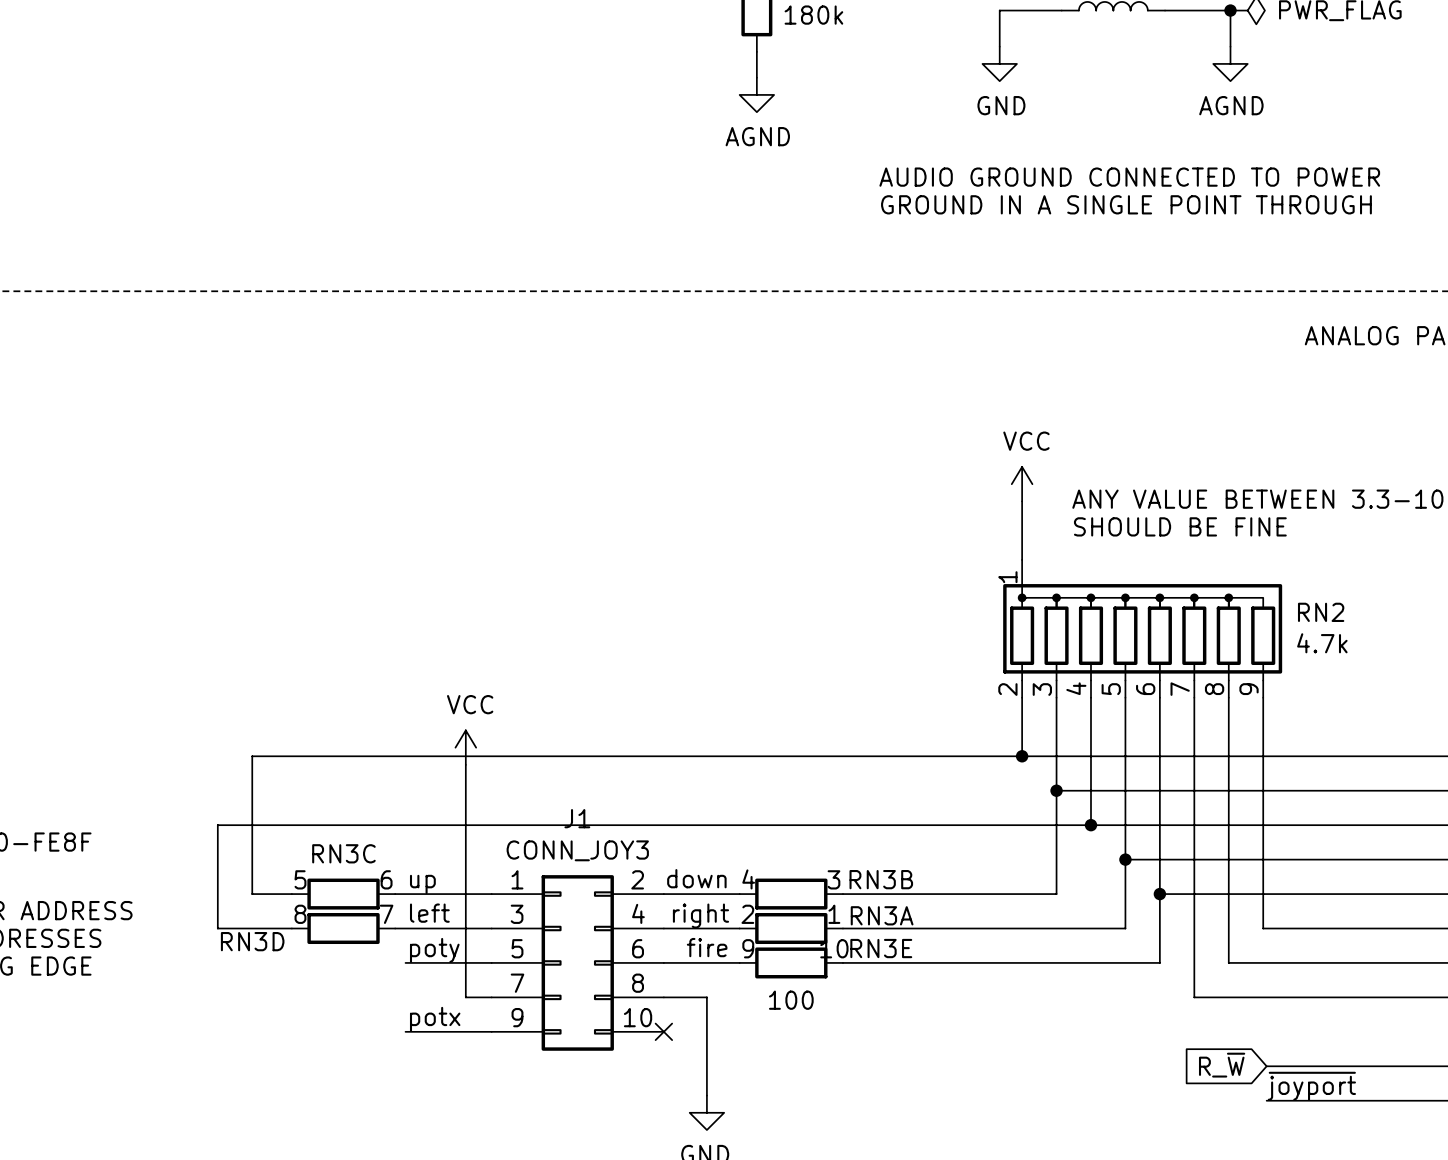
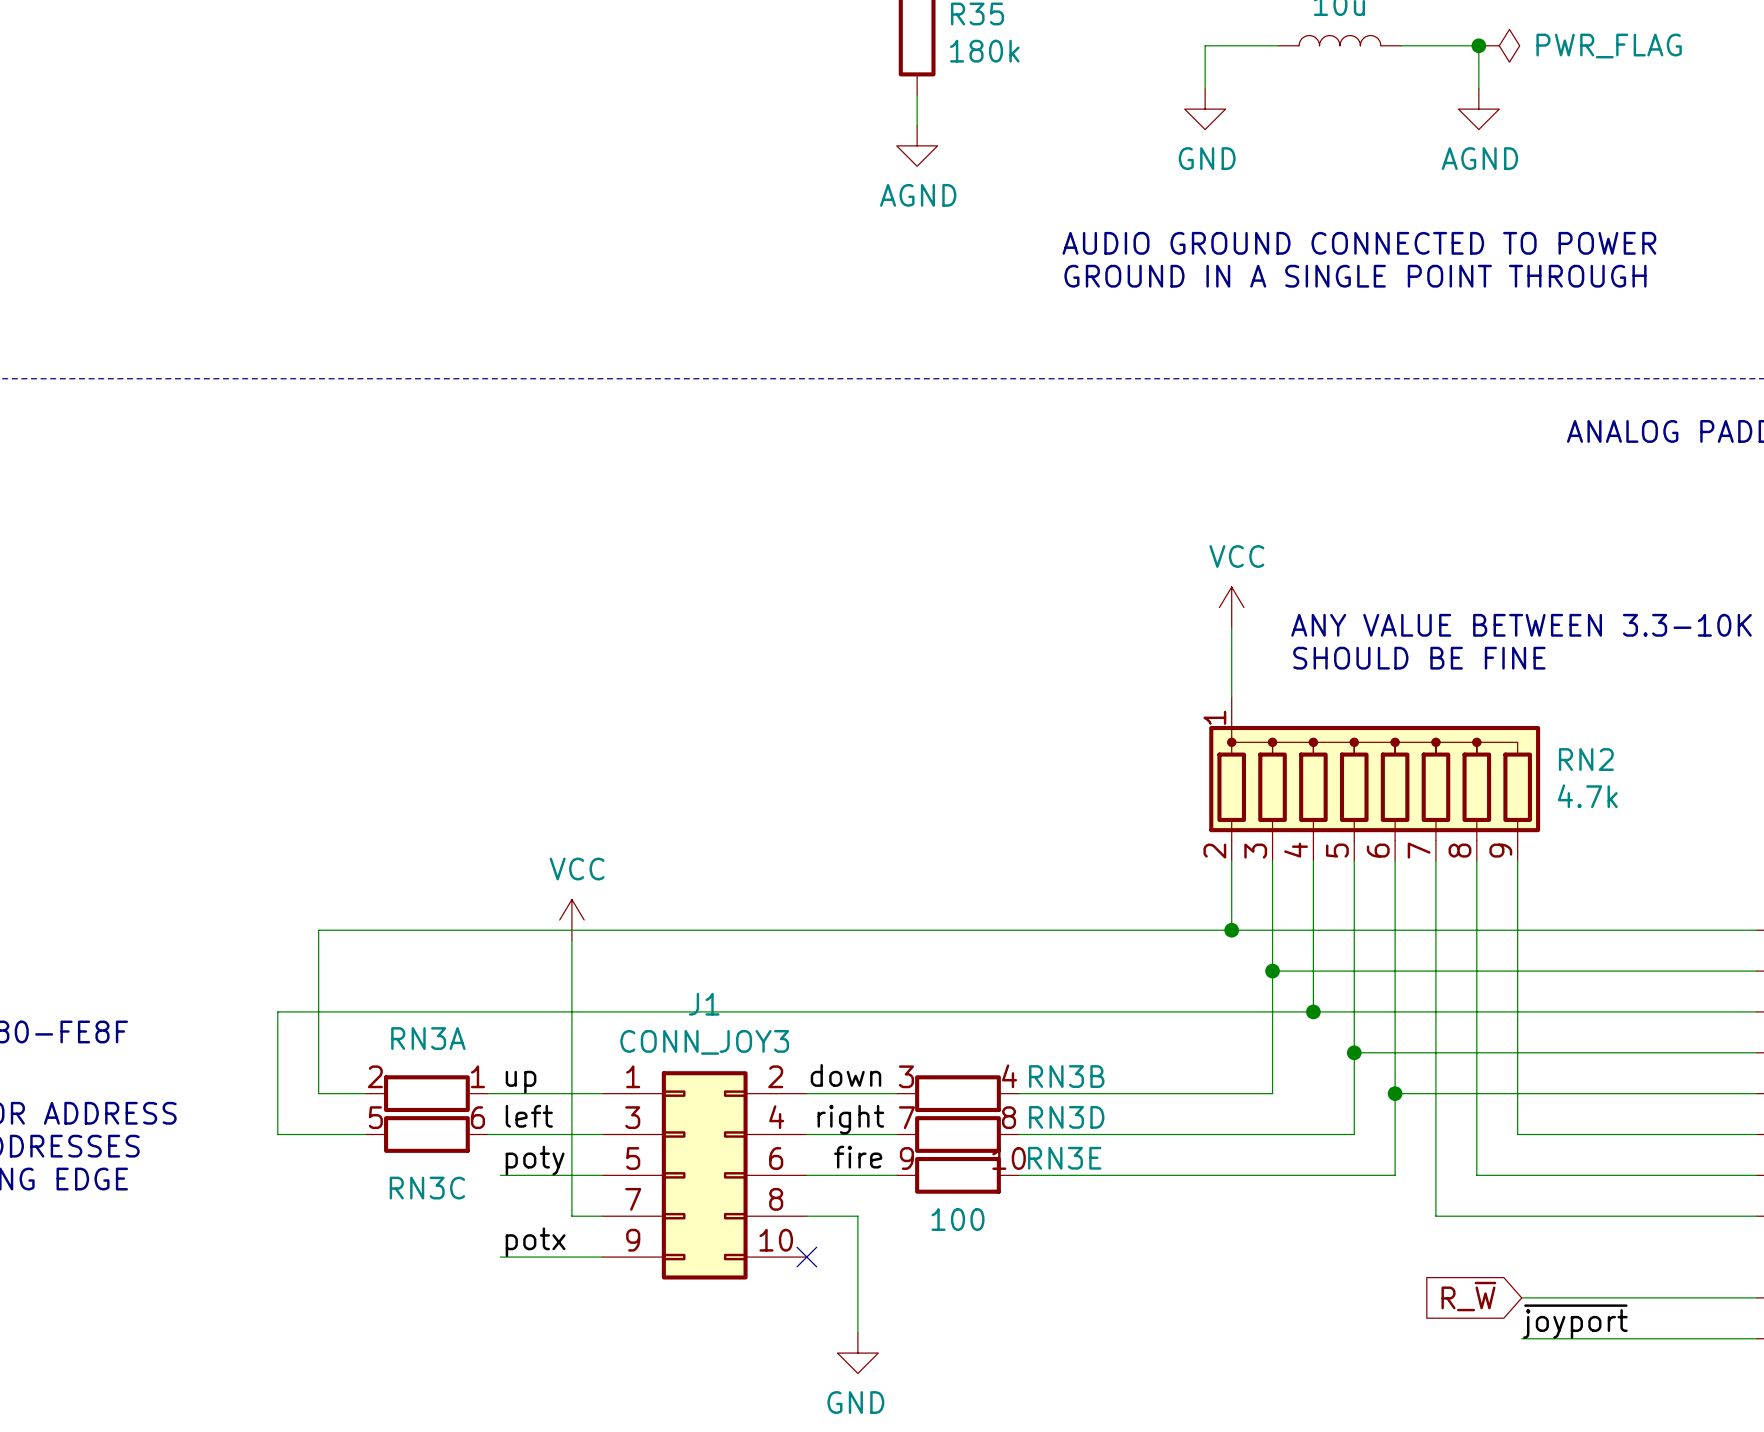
RN3C name position: RN3C (343, 853) -> RN3C (427, 1188)
RN3C position: (343, 894) -> (426, 1134)
RN3B rotation: 0° (791, 894) -> 180° (957, 1093)
RN3A name position: RN3A (882, 915) -> RN3A (428, 1038)
RN3D rotation: 0° (343, 928) -> 180° (957, 1134)
RN3D position: (343, 928) -> (957, 1134)
RN3A position: (791, 928) -> (426, 1093)

